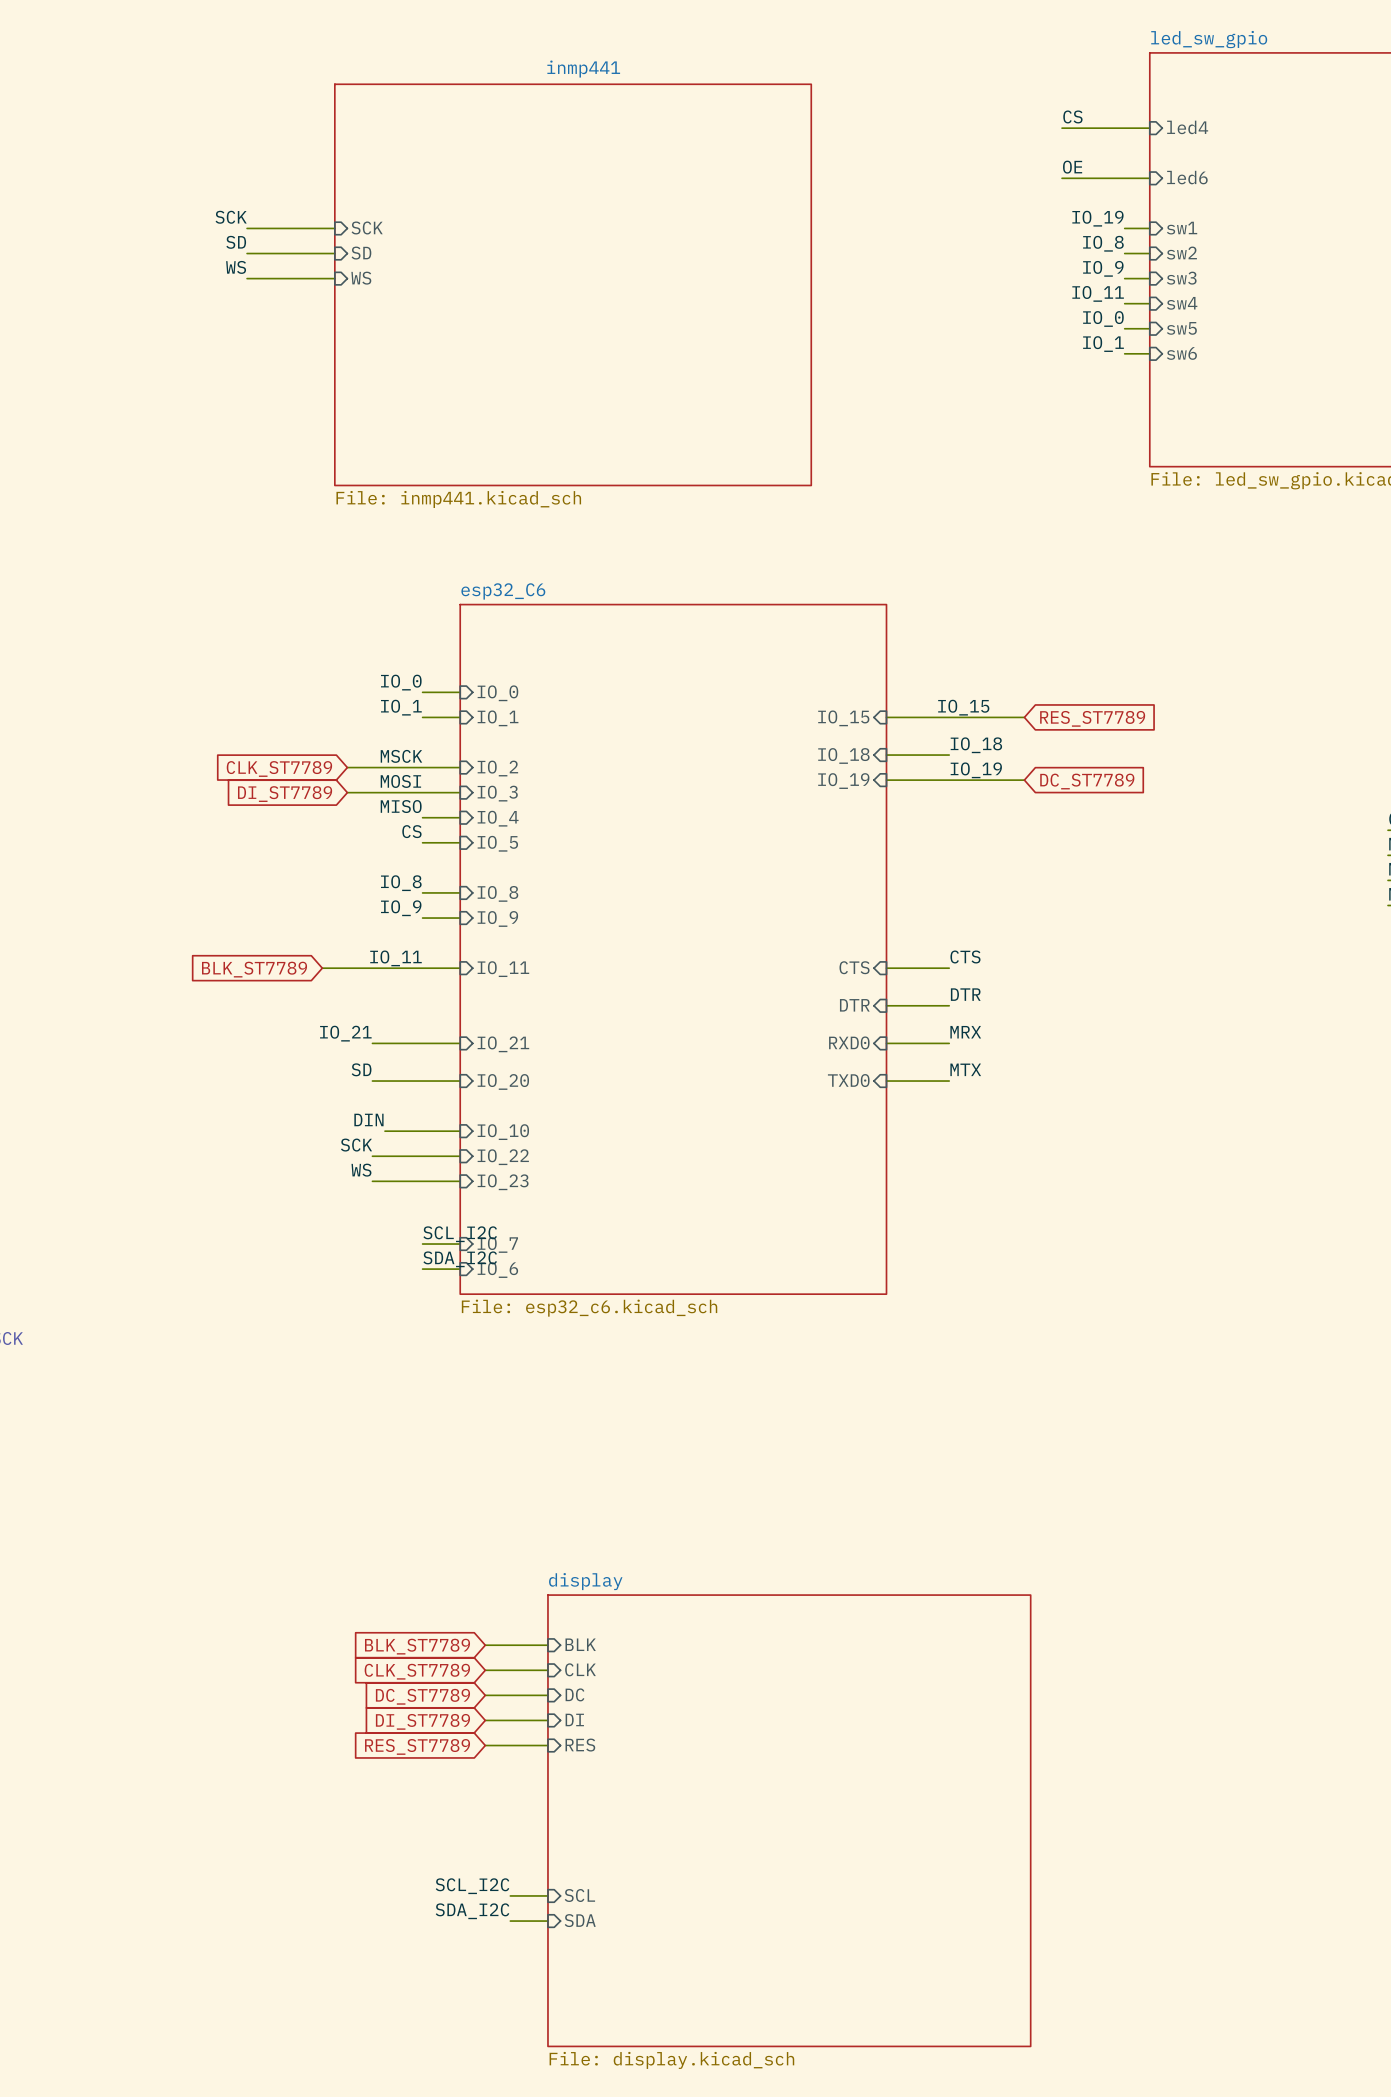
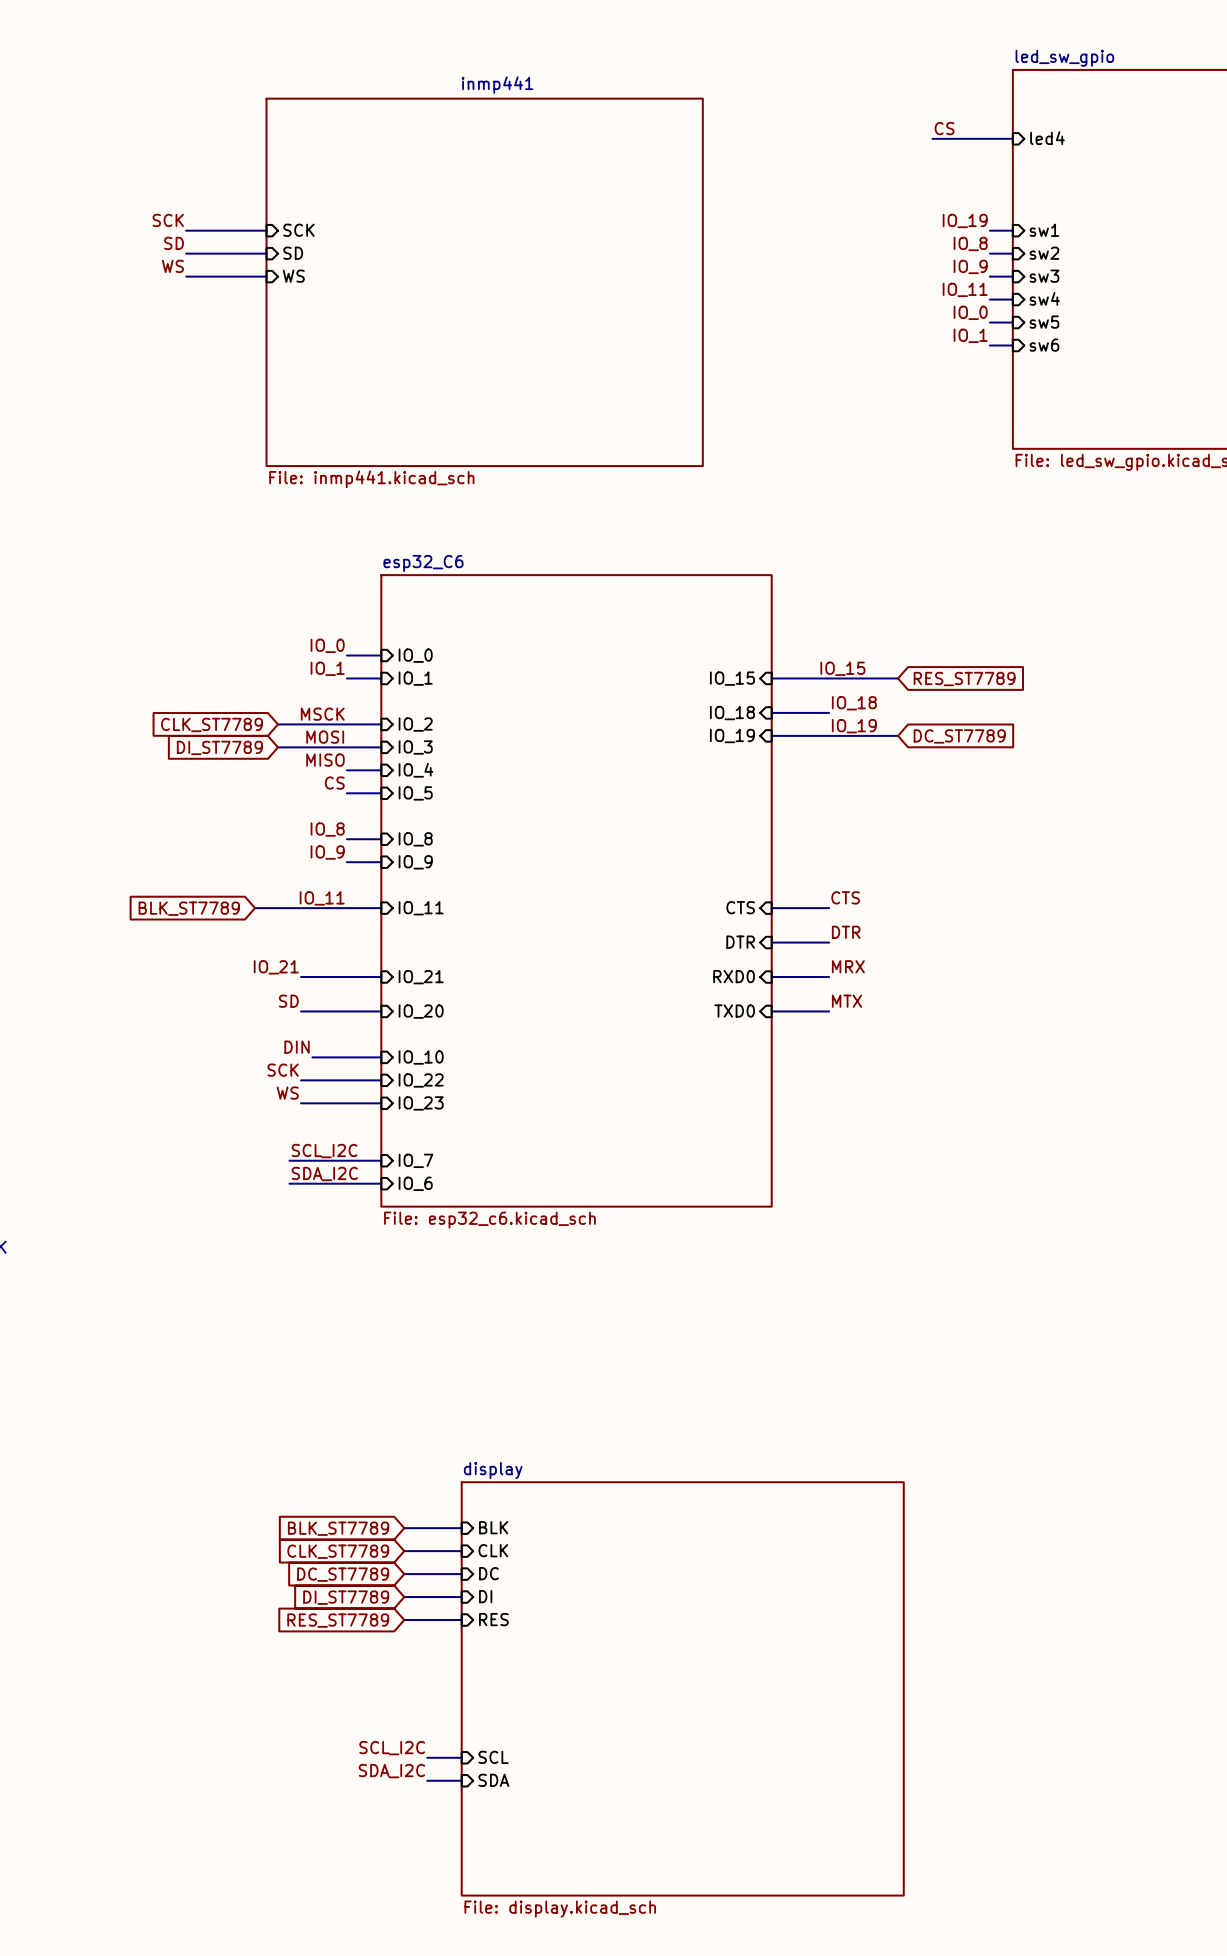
label: OE (1072, 167) -> none
sheet pin: led6 (1187, 177) -> none
wire: (1062, 178) (1149, 178) -> none
label position: SCL_I2C (460, 1234) -> SCL_I2C (324, 1151)
wire: none -> (289, 1160) (346, 1160)
label position: SDA_I2C (460, 1259) -> SDA_I2C (324, 1173)
wire: none -> (289, 1183) (346, 1183)

